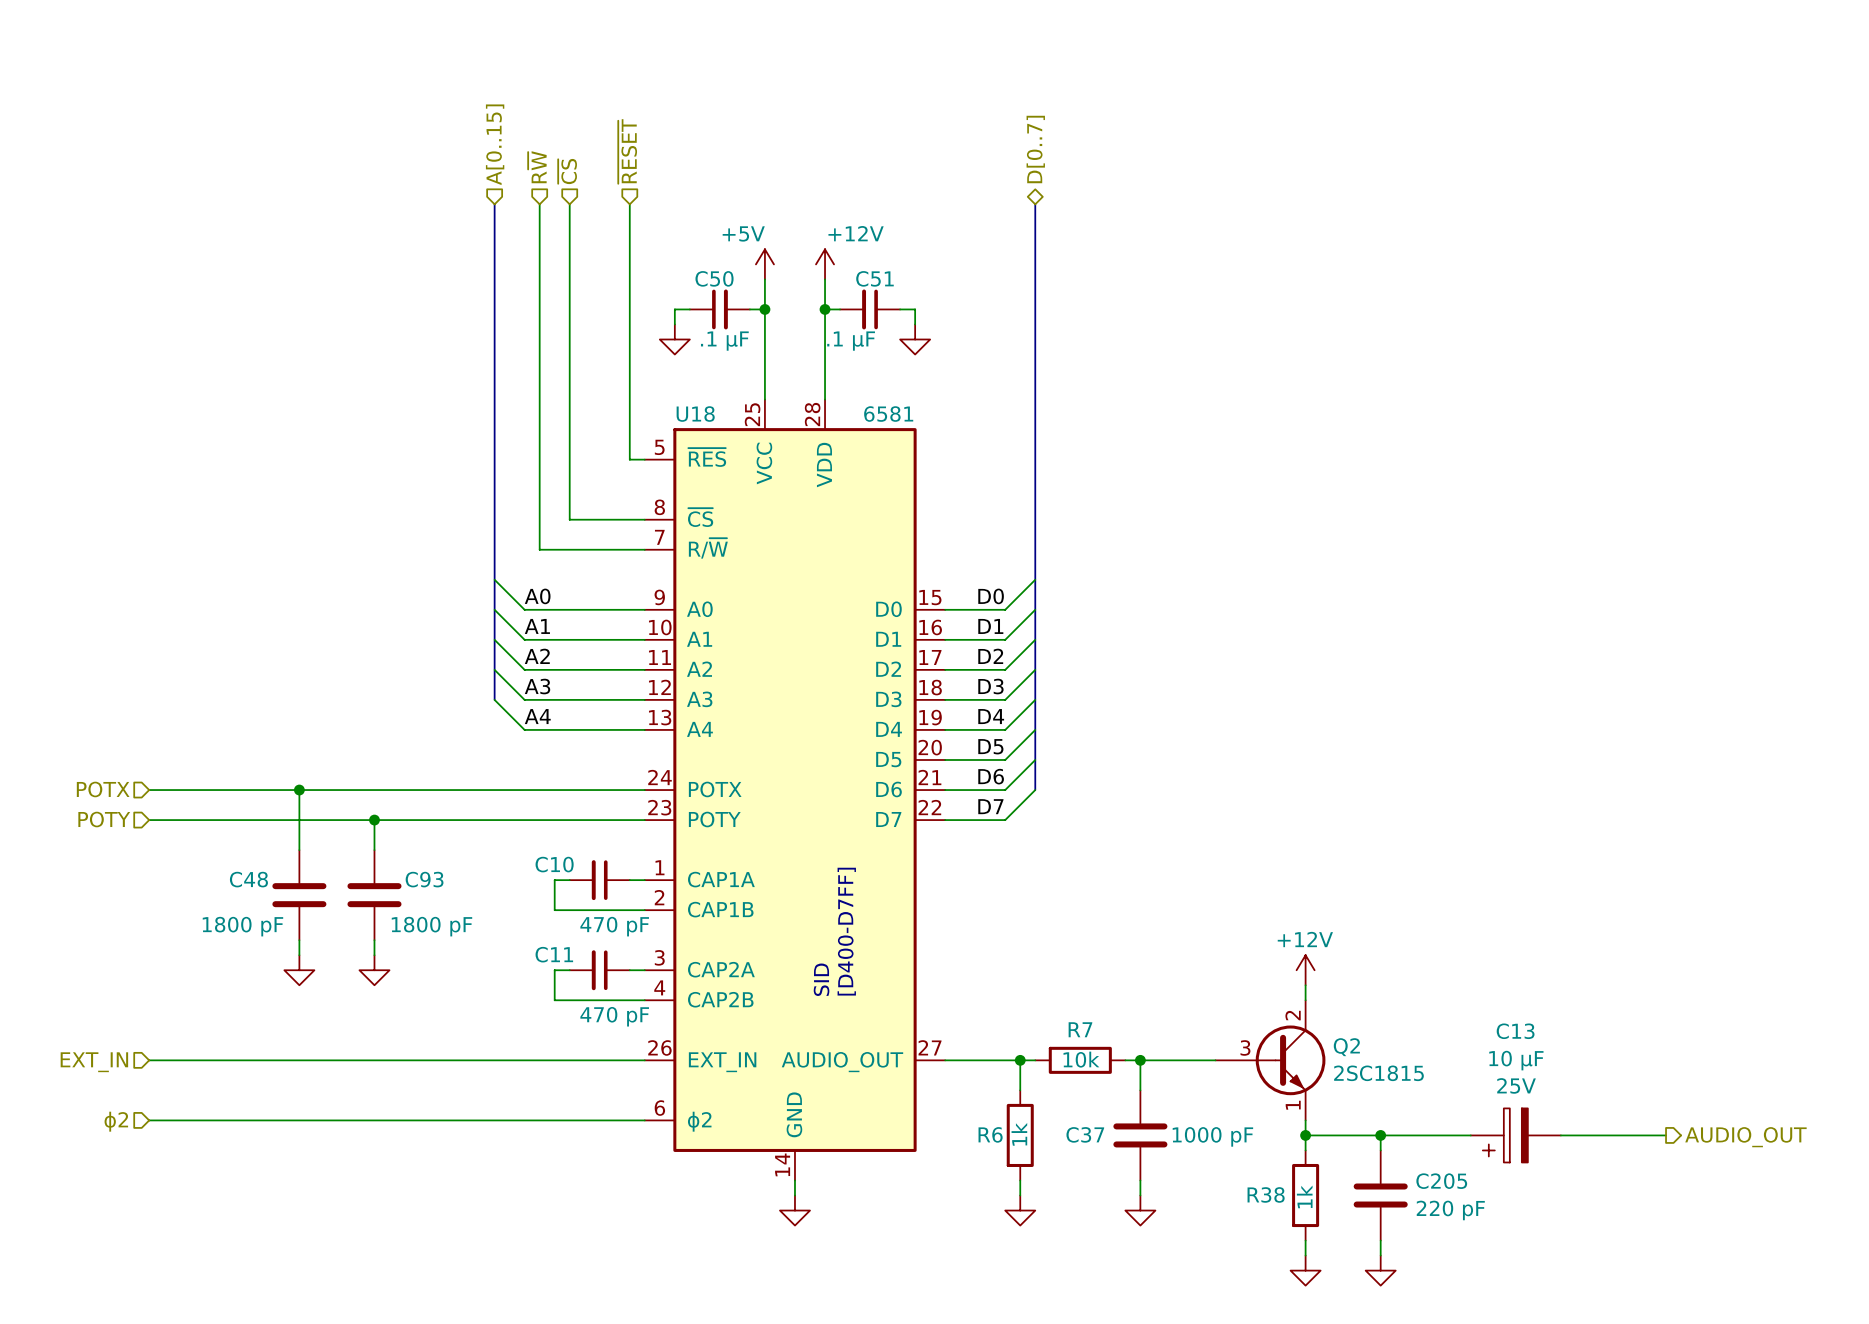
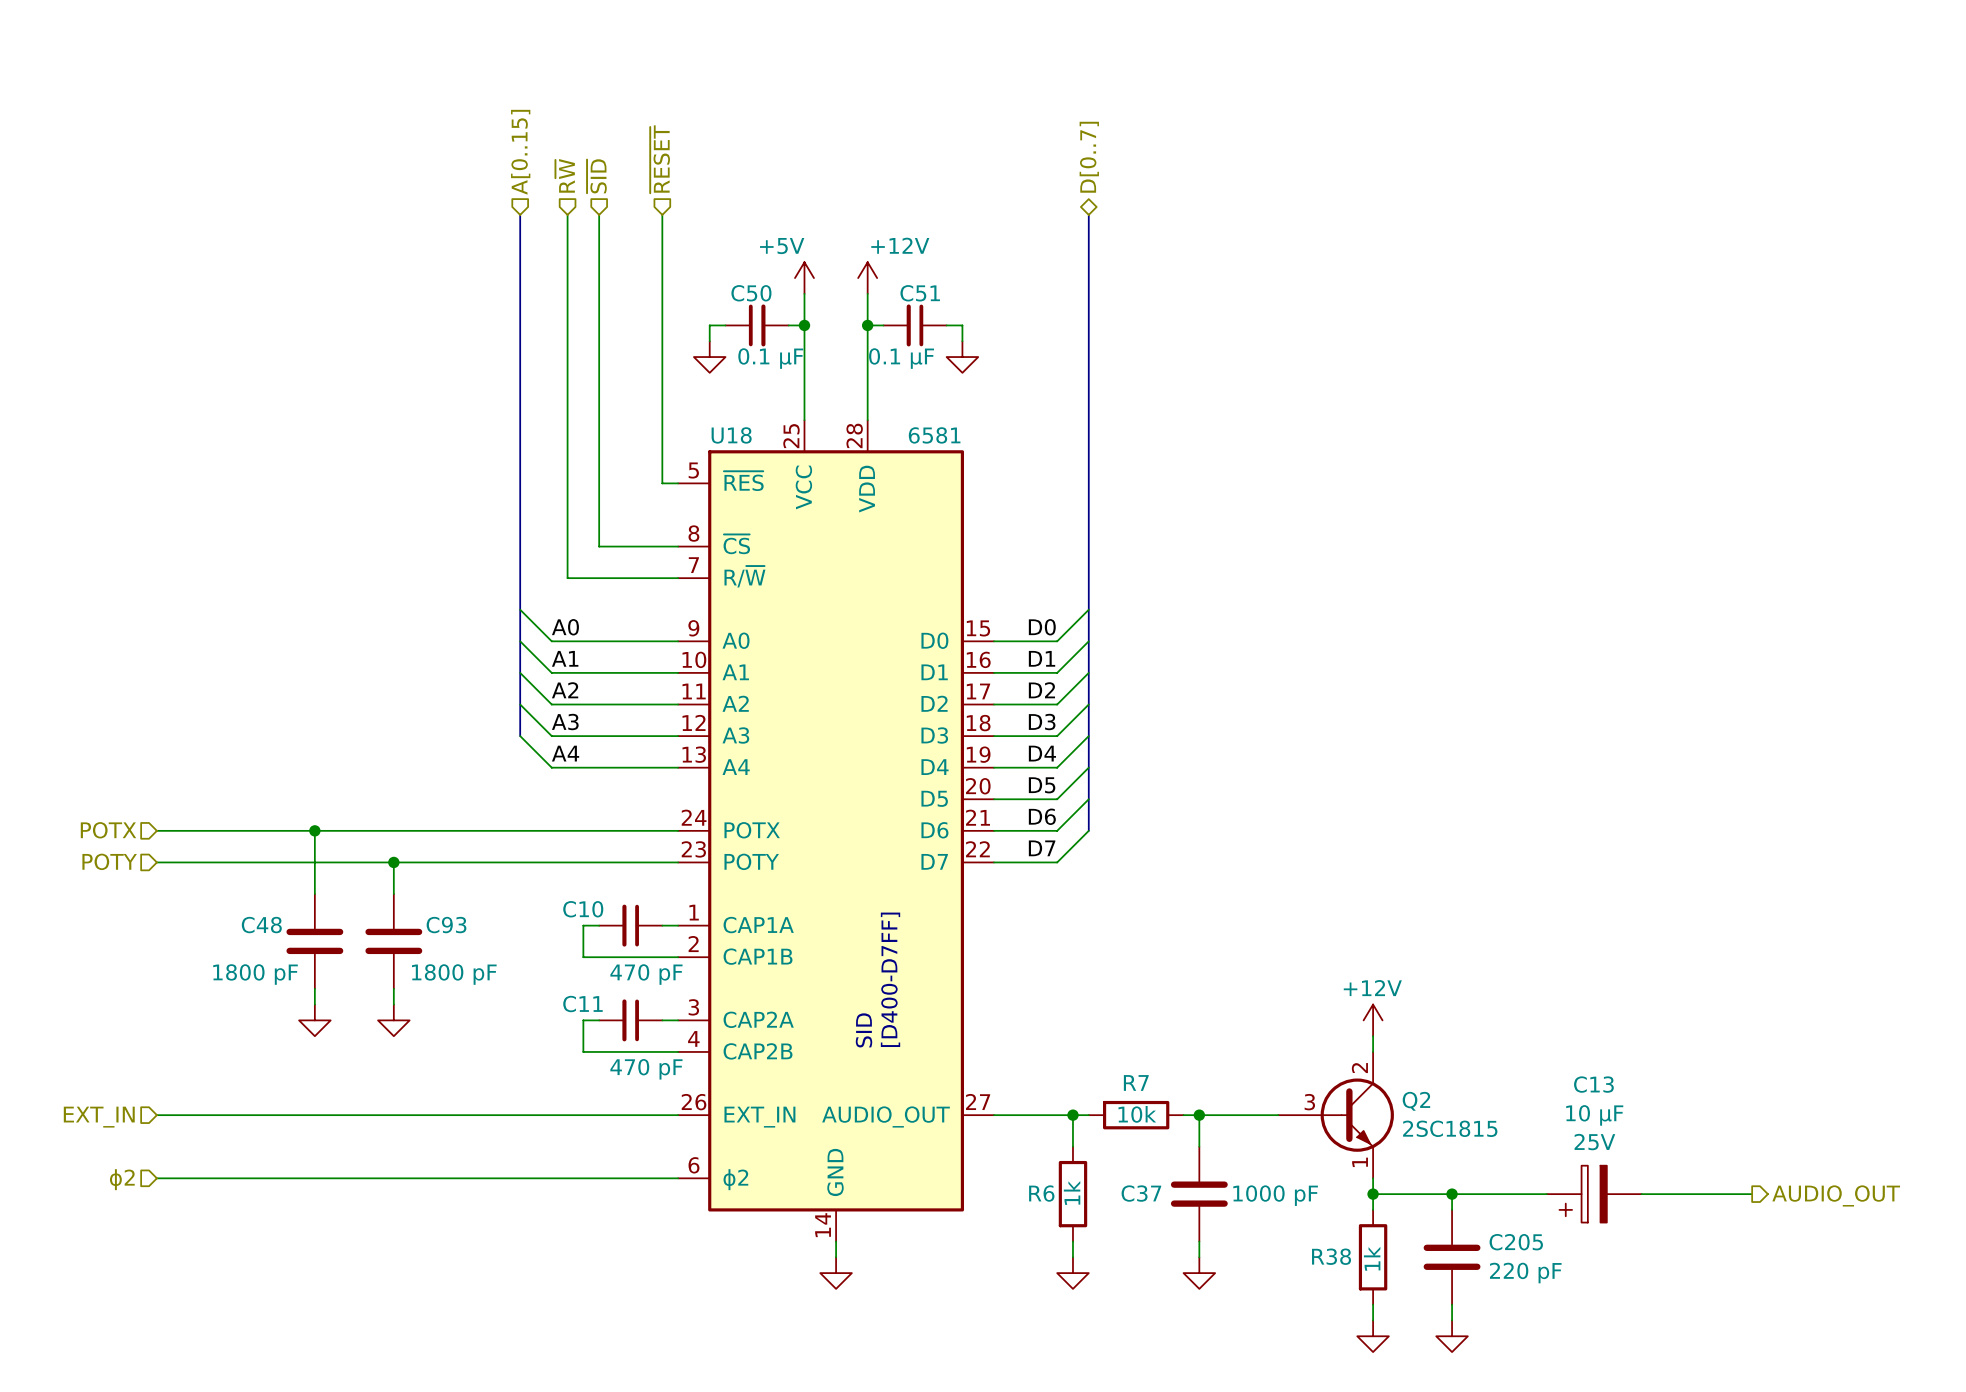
hierarchical label: ~{CS} (567, 171) -> ~{SID} (596, 176)
C50 value: .1 μF (724, 341) -> 0.1 μF (770, 358)
C51 value: .1 μF (851, 341) -> 0.1 μF (901, 358)

